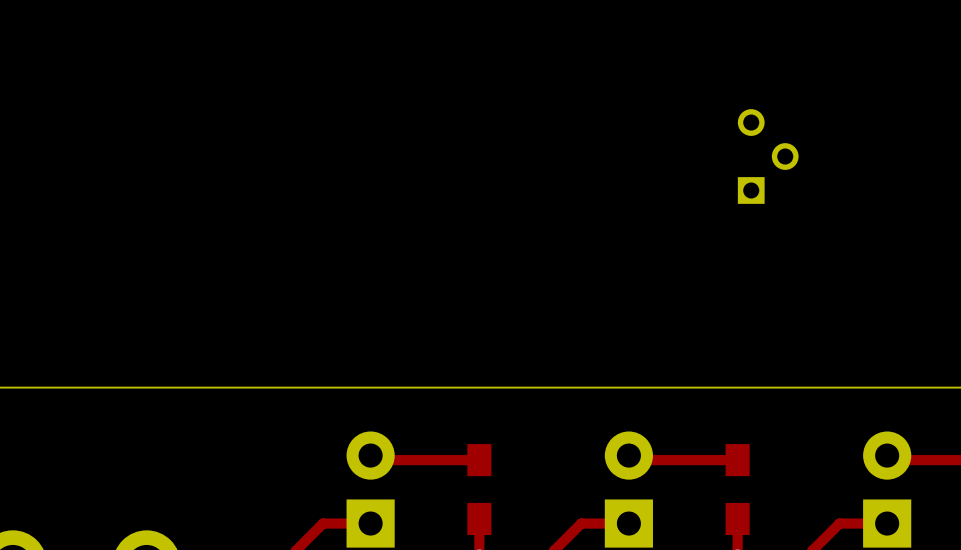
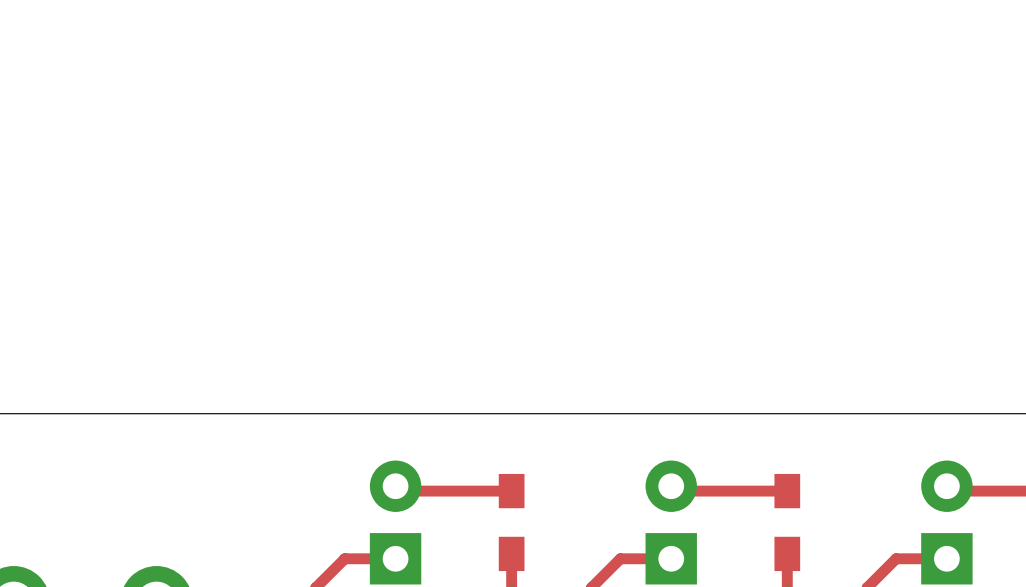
part: (768, 156) -> none

